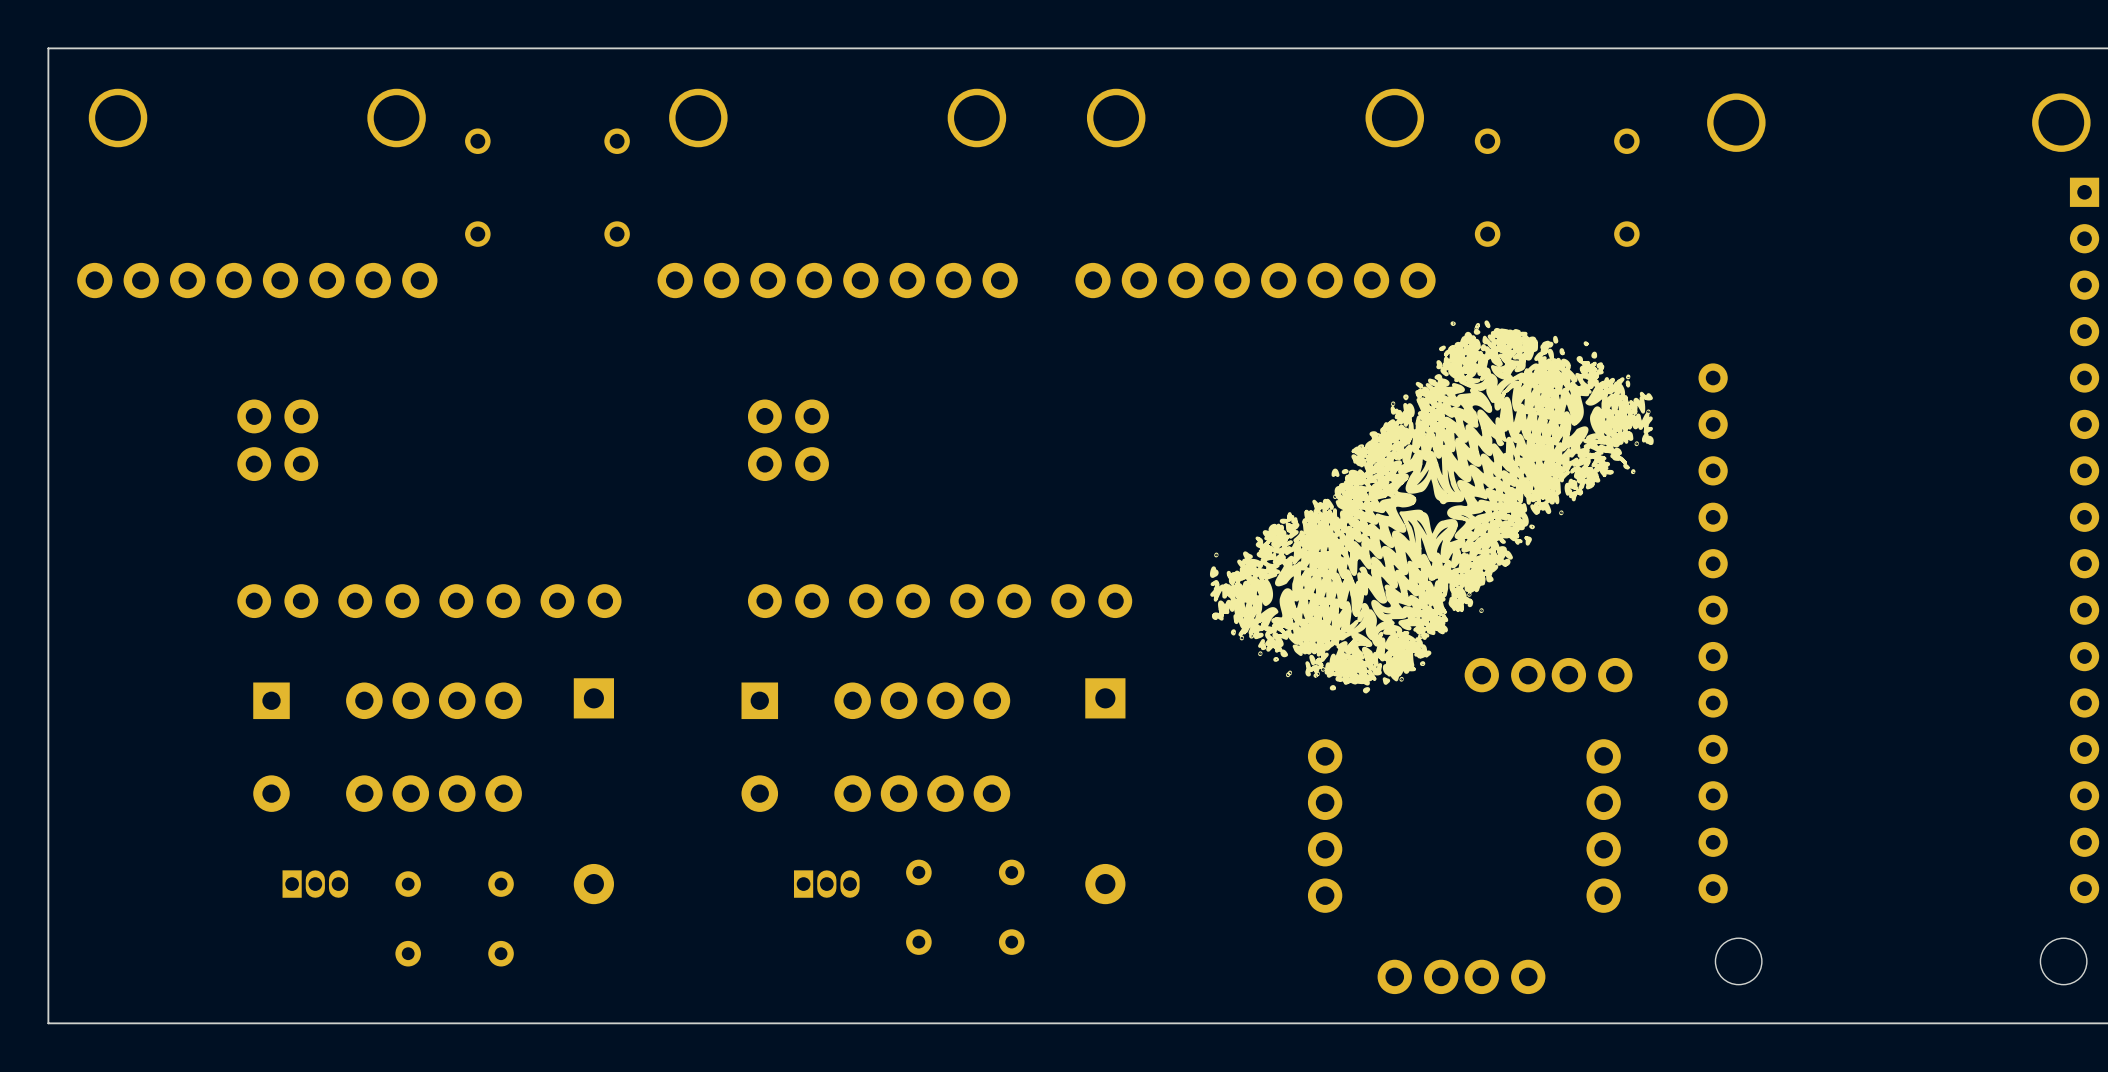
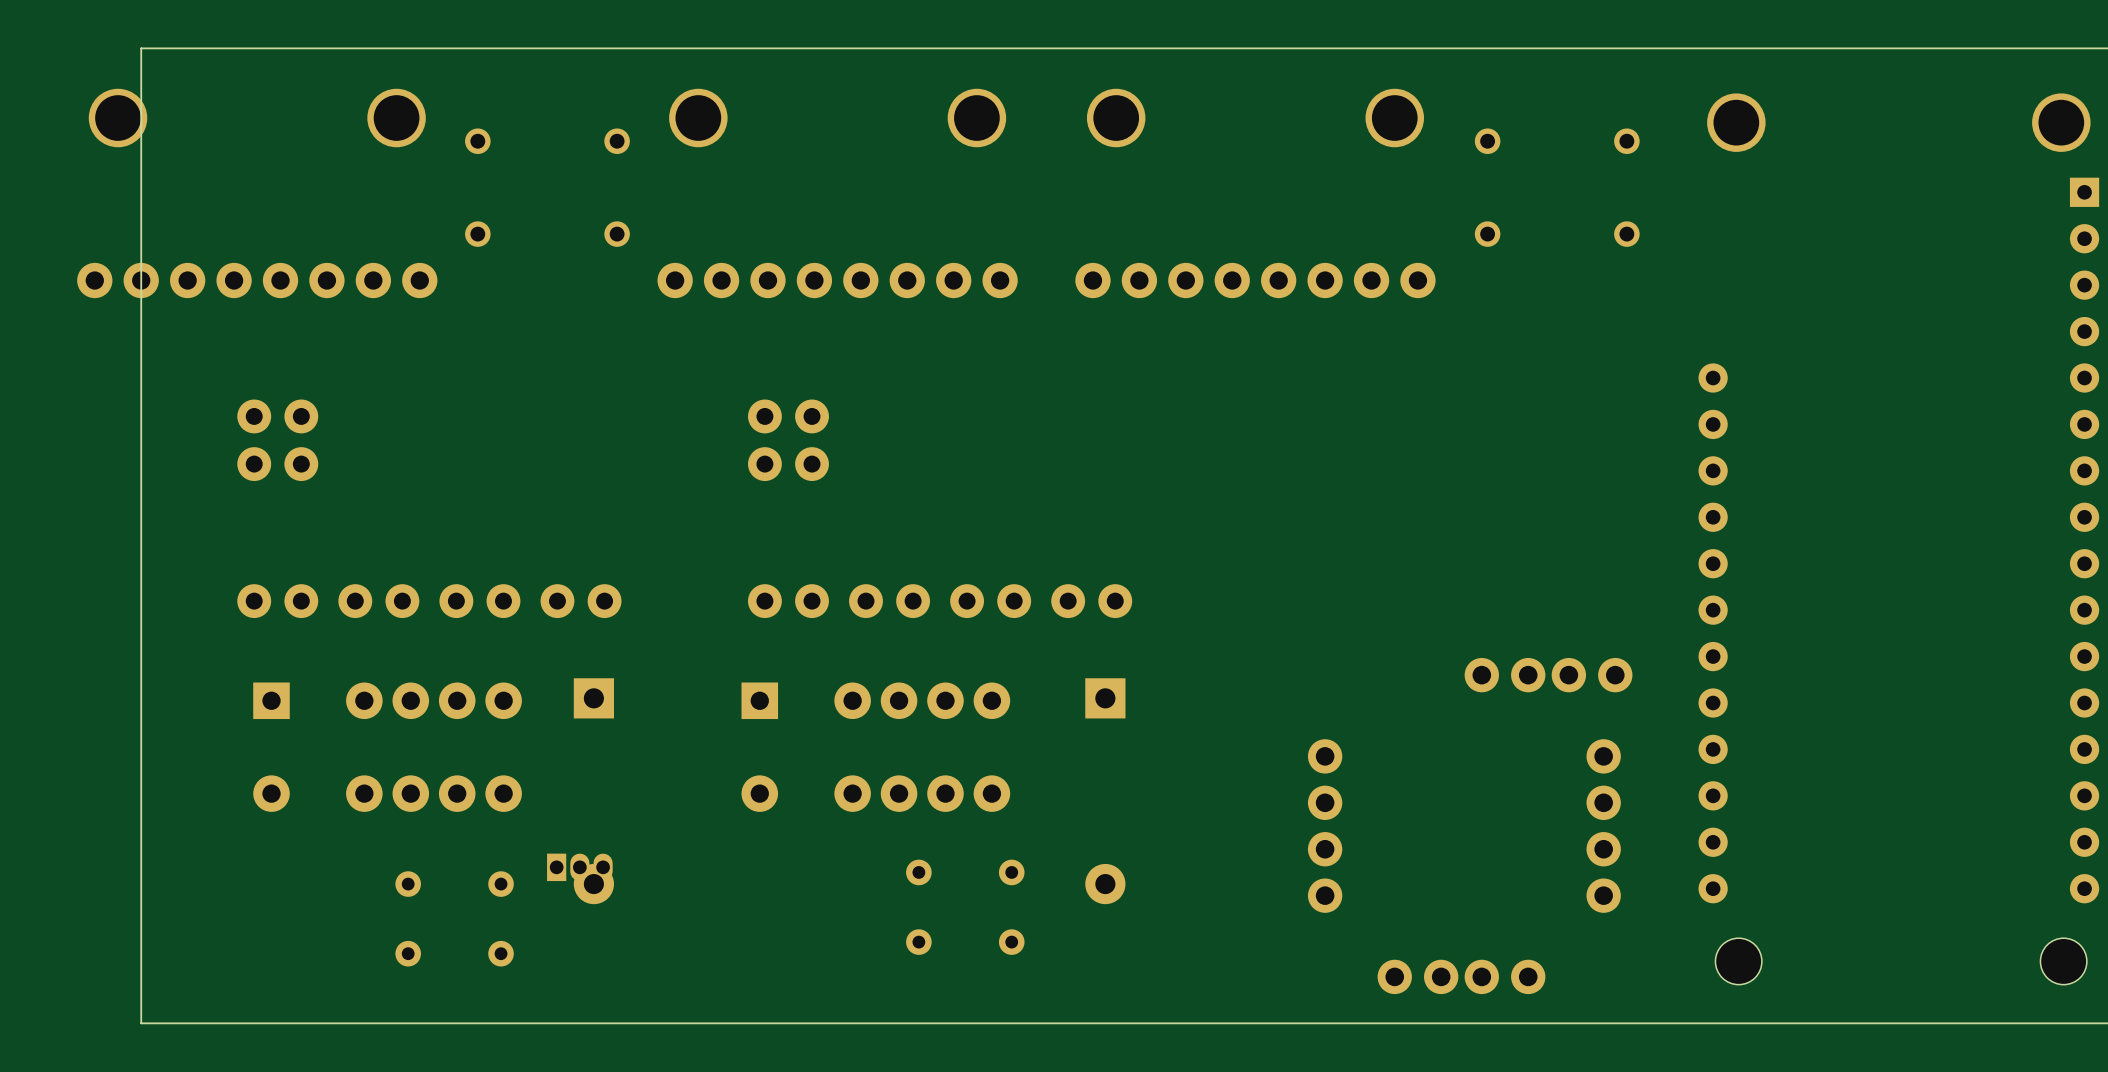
board edge: (141, 48) (48, 48) (48, 1023) (141, 1023) -> (141, 48) (141, 1023)
drawing: [1209, 320, 1654, 694] -> none
part: none -> (579, 867)
part: (315, 884) -> none
part: (826, 884) -> none

